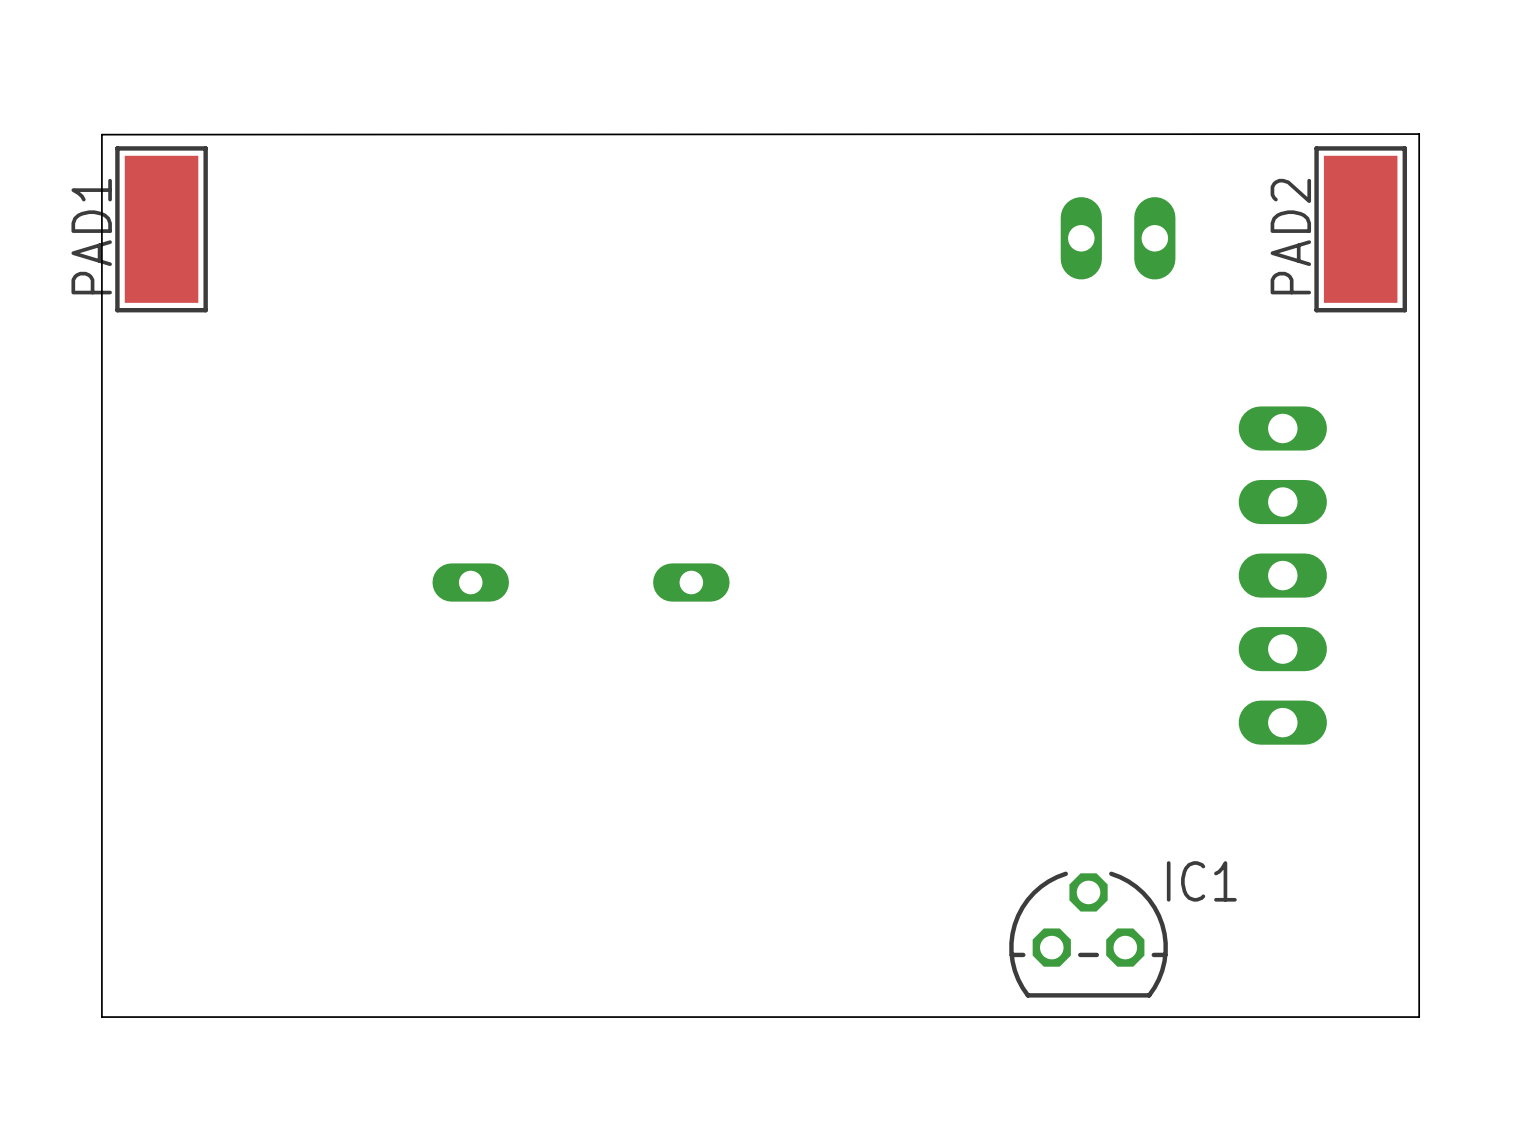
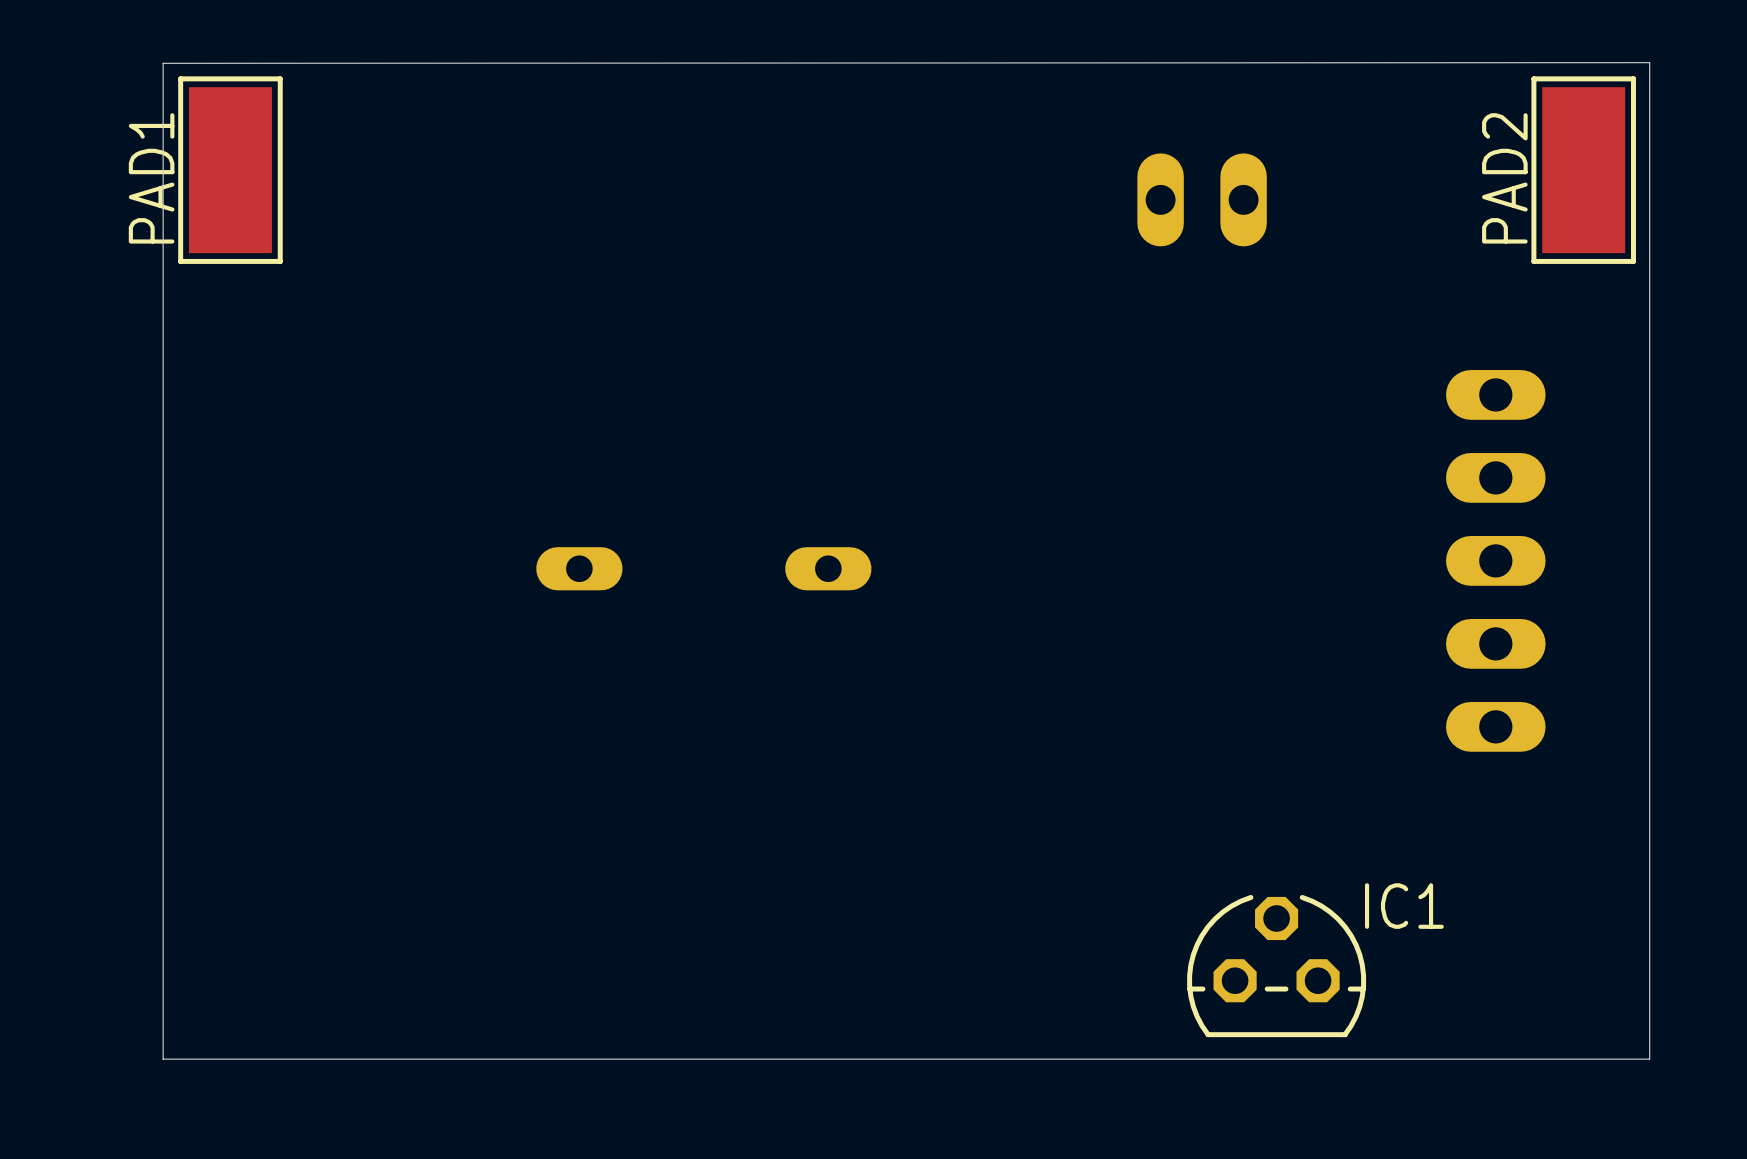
part position: (1118, 238) -> (1202, 199)

